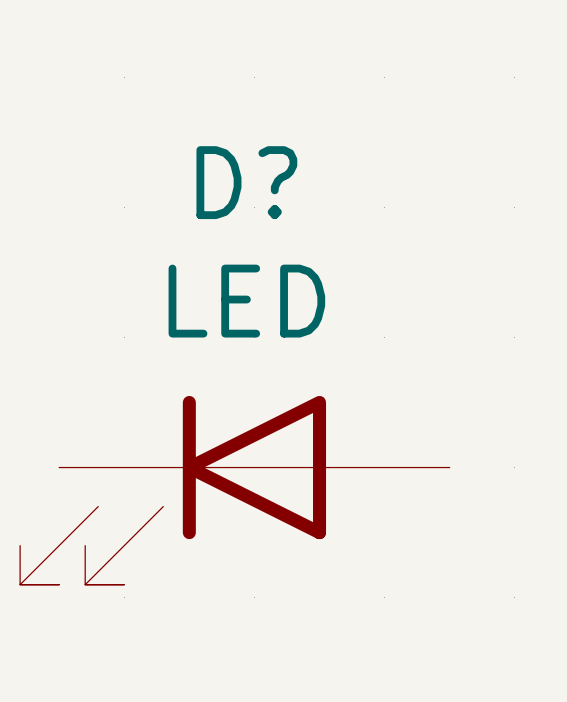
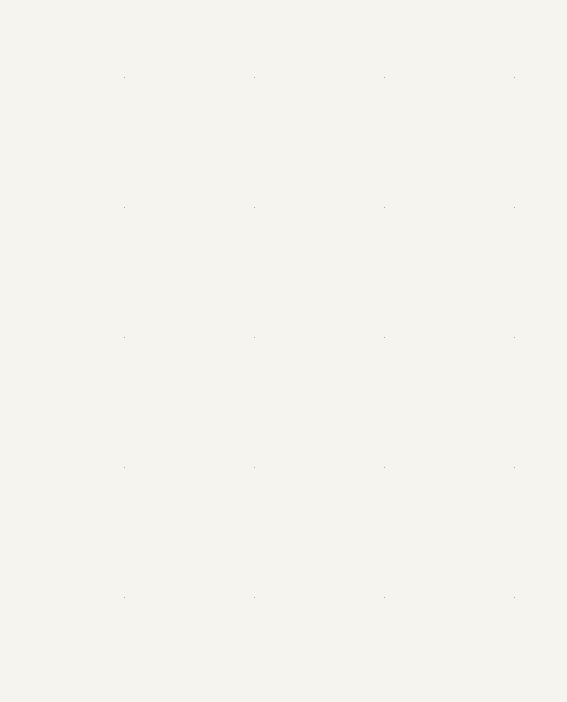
D?: LED (234, 490) -> none

